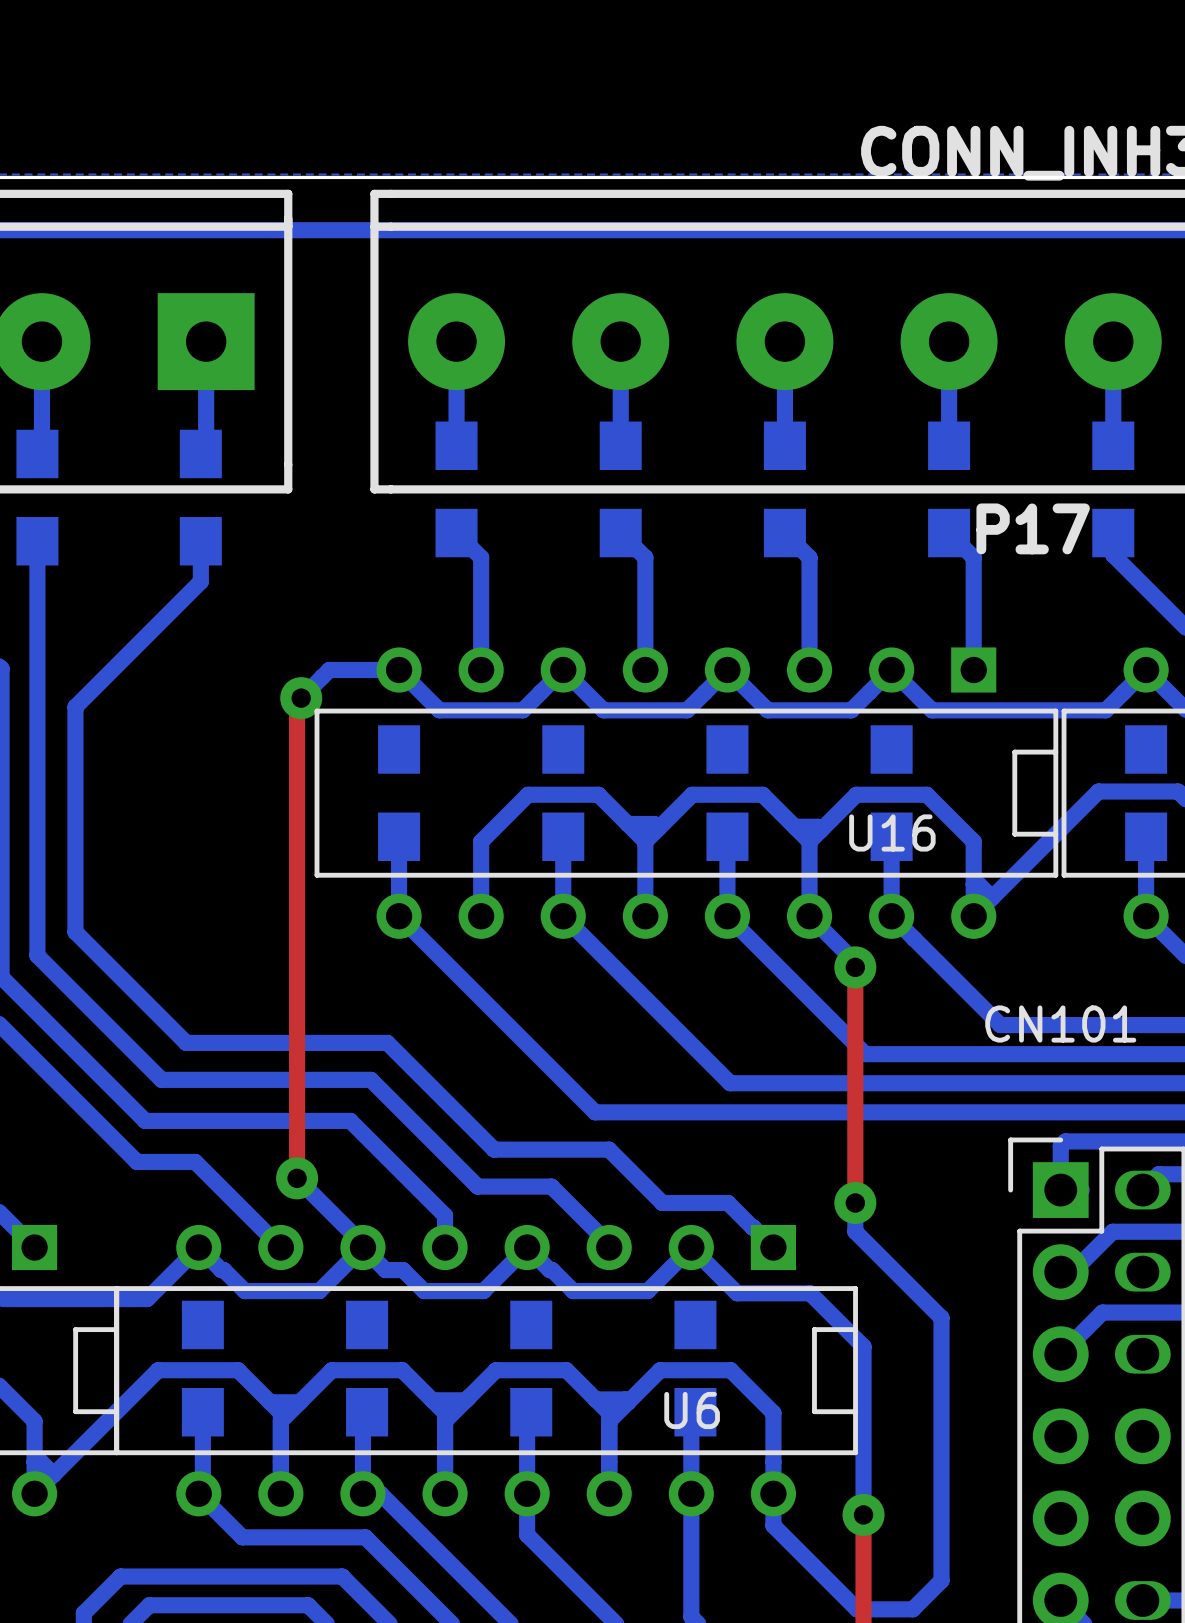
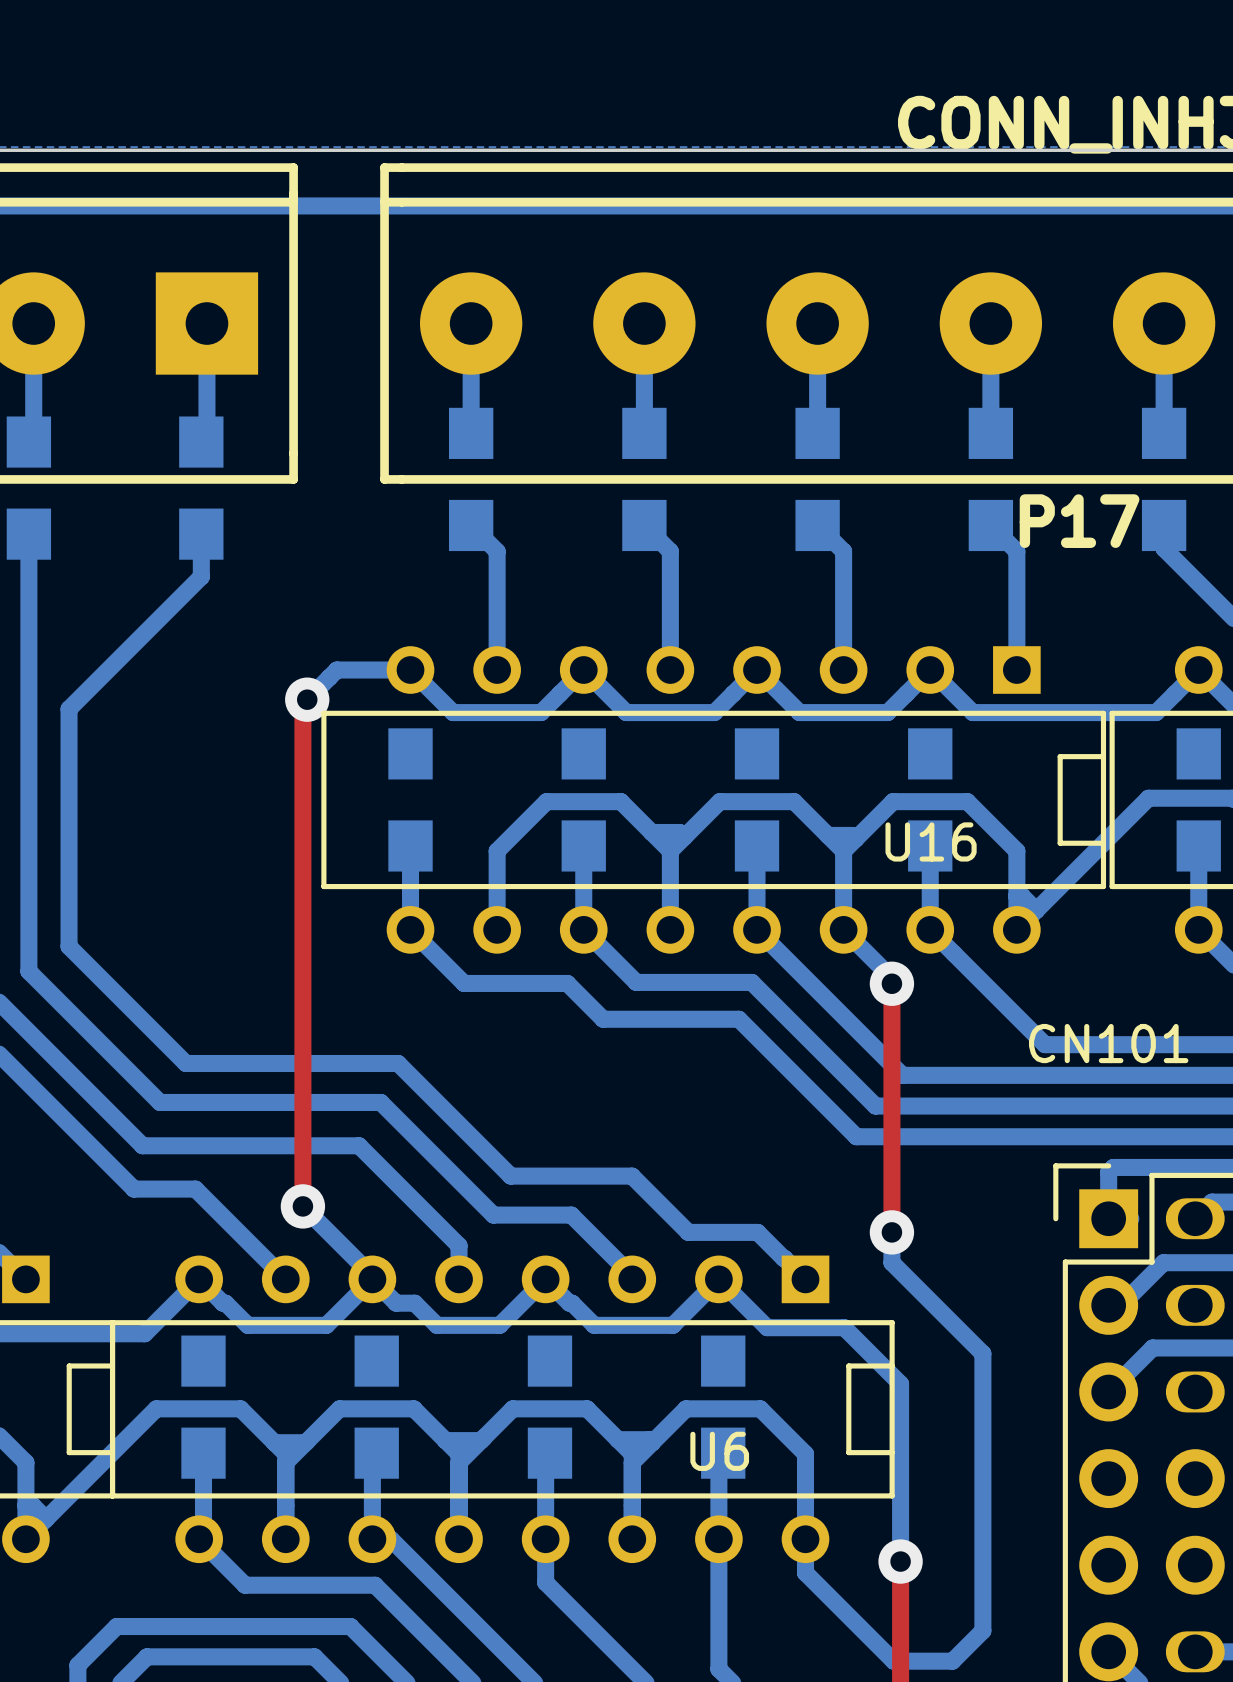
bottom track: (613, 966) (730, 1083) (839, 1083) -> (636, 982) (751, 982) (875, 1106)
bottom track: (449, 967) (595, 1112) (821, 1112) -> (464, 983) (567, 983) (603, 1019) (738, 1019) (856, 1136)

